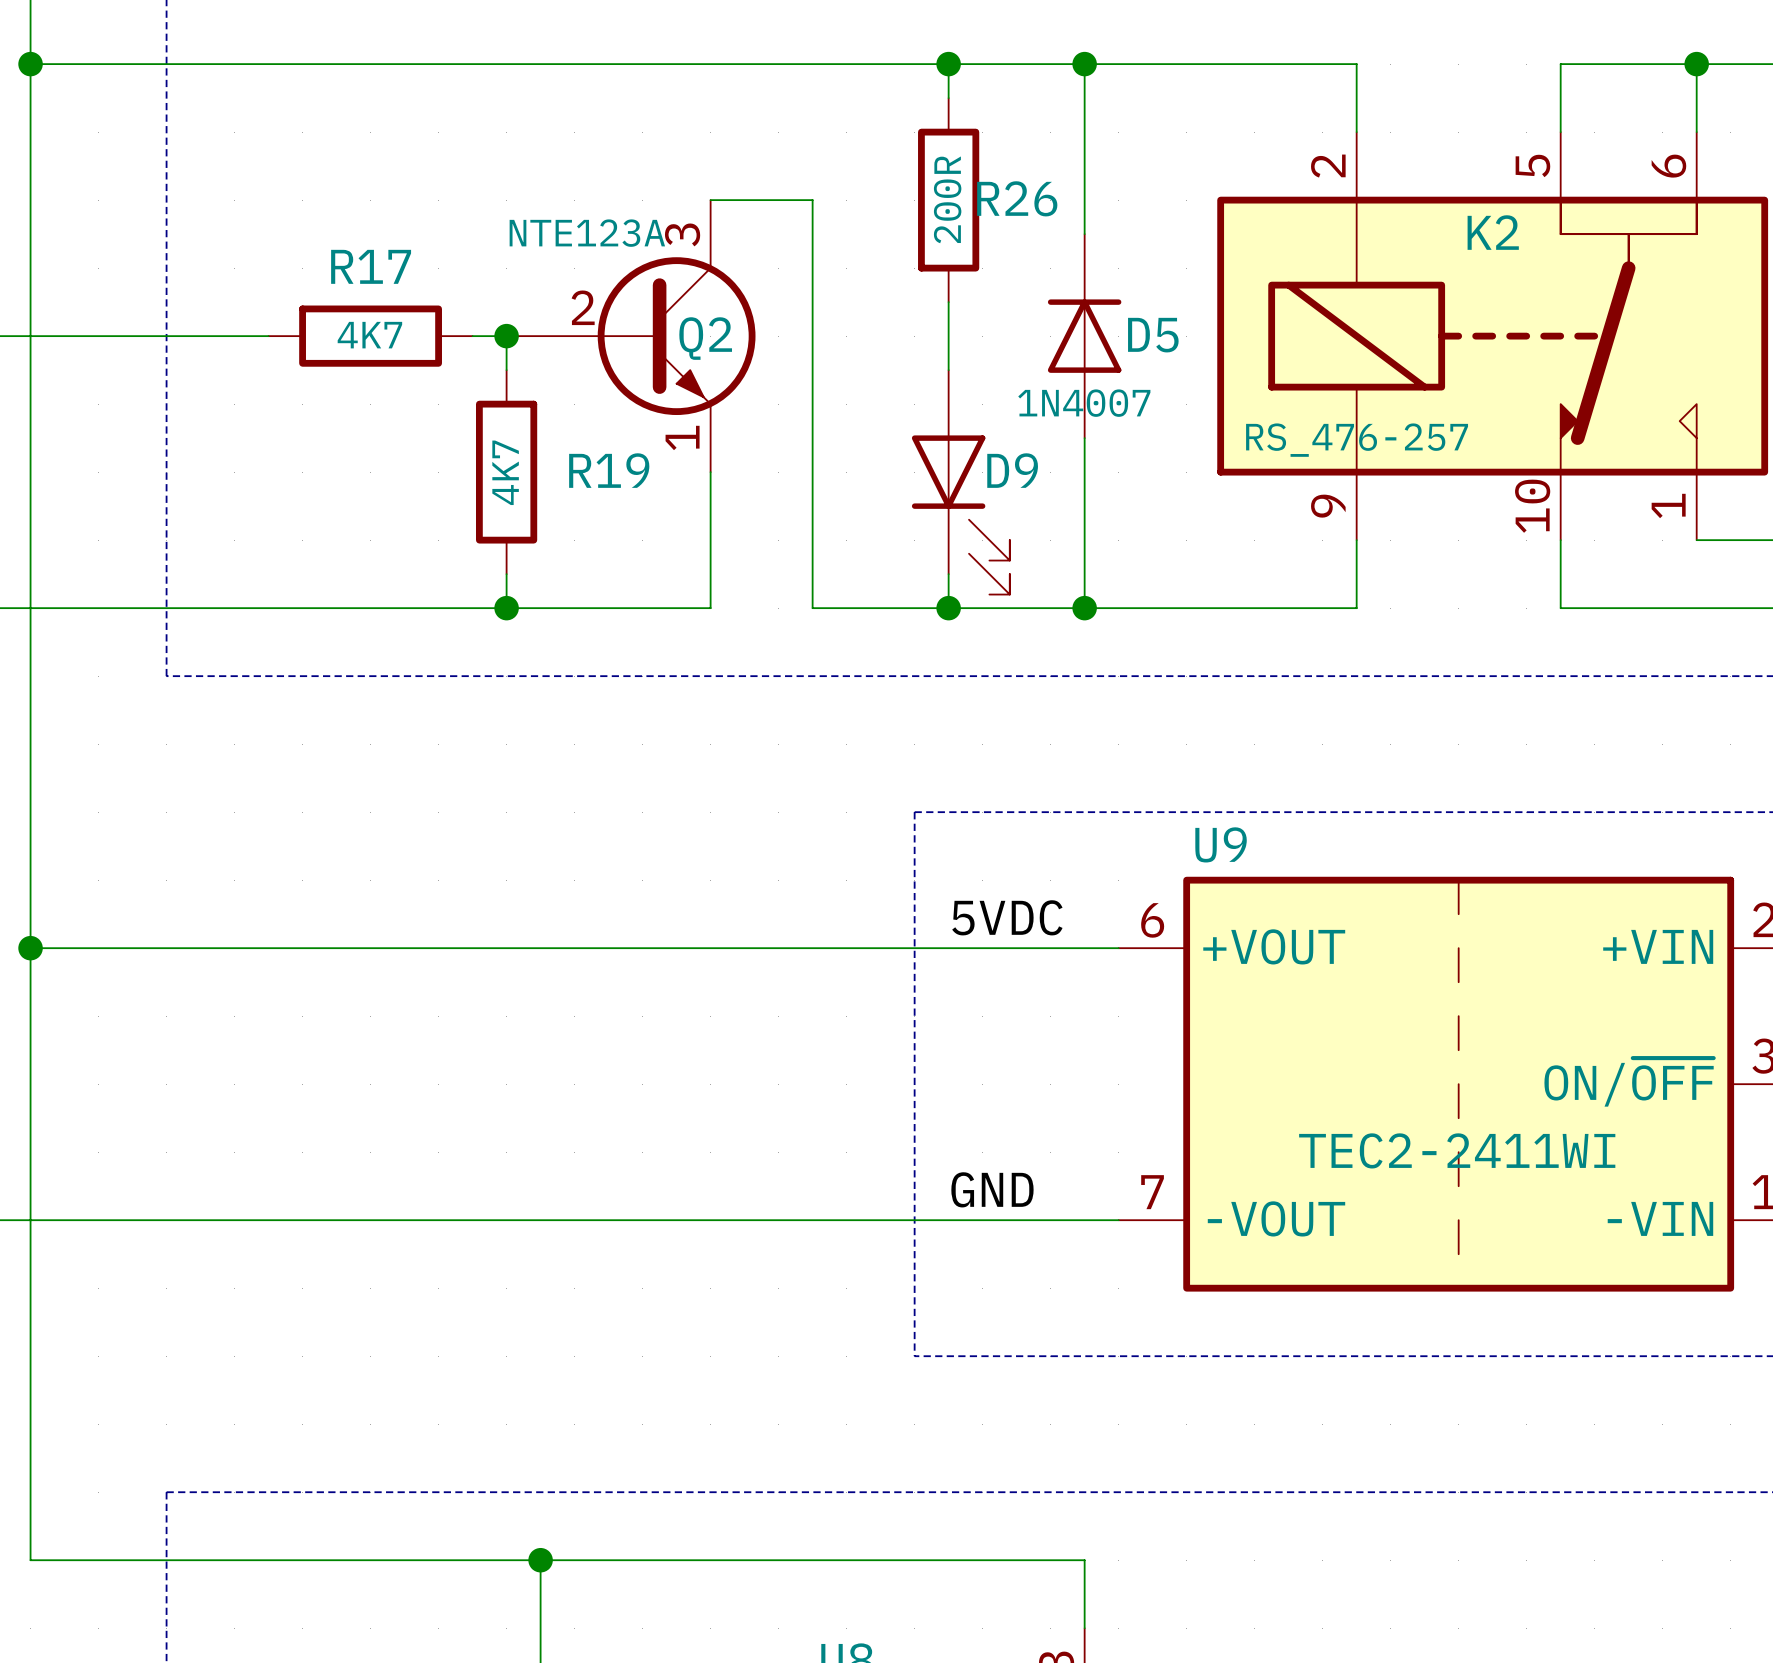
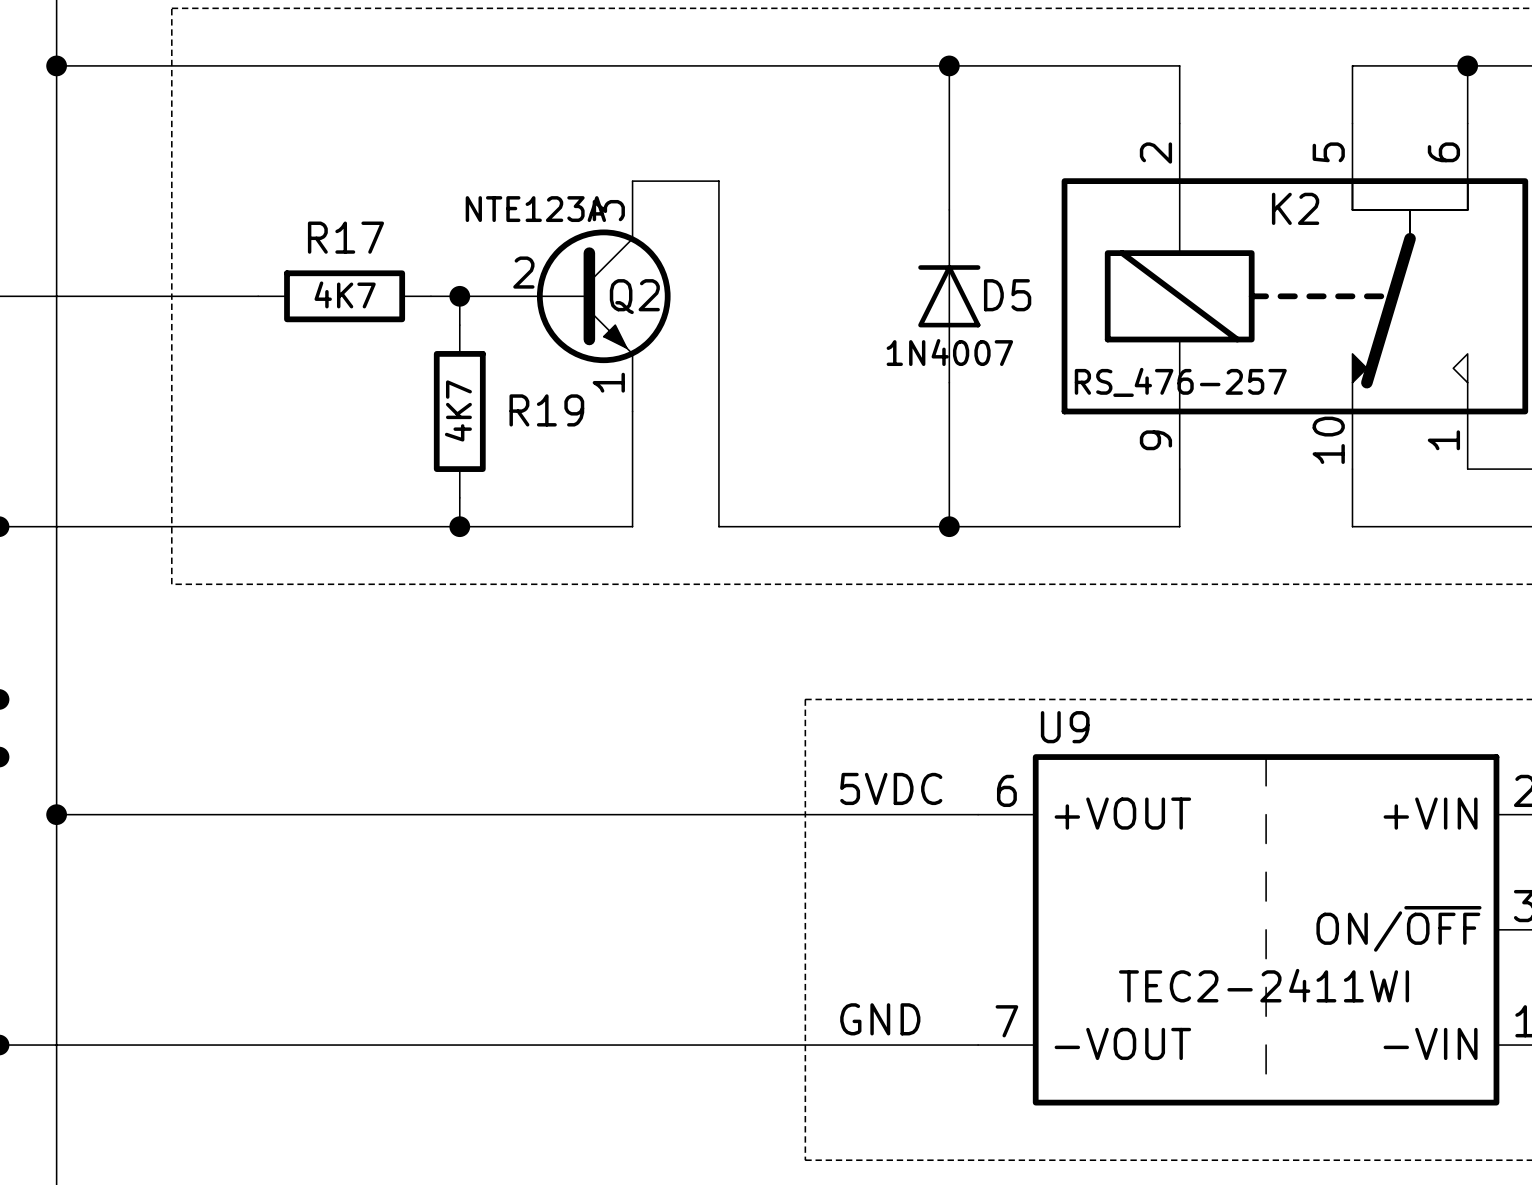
wire: (948, 64) (948, 98) -> none
junction: (948, 64) -> none
R26: 200R (948, 200) -> none
wire: (948, 302) (948, 370) -> none
D9: (960, 482) -> none
wire: (948, 574) (948, 608) -> none
junction: (948, 608) -> none

